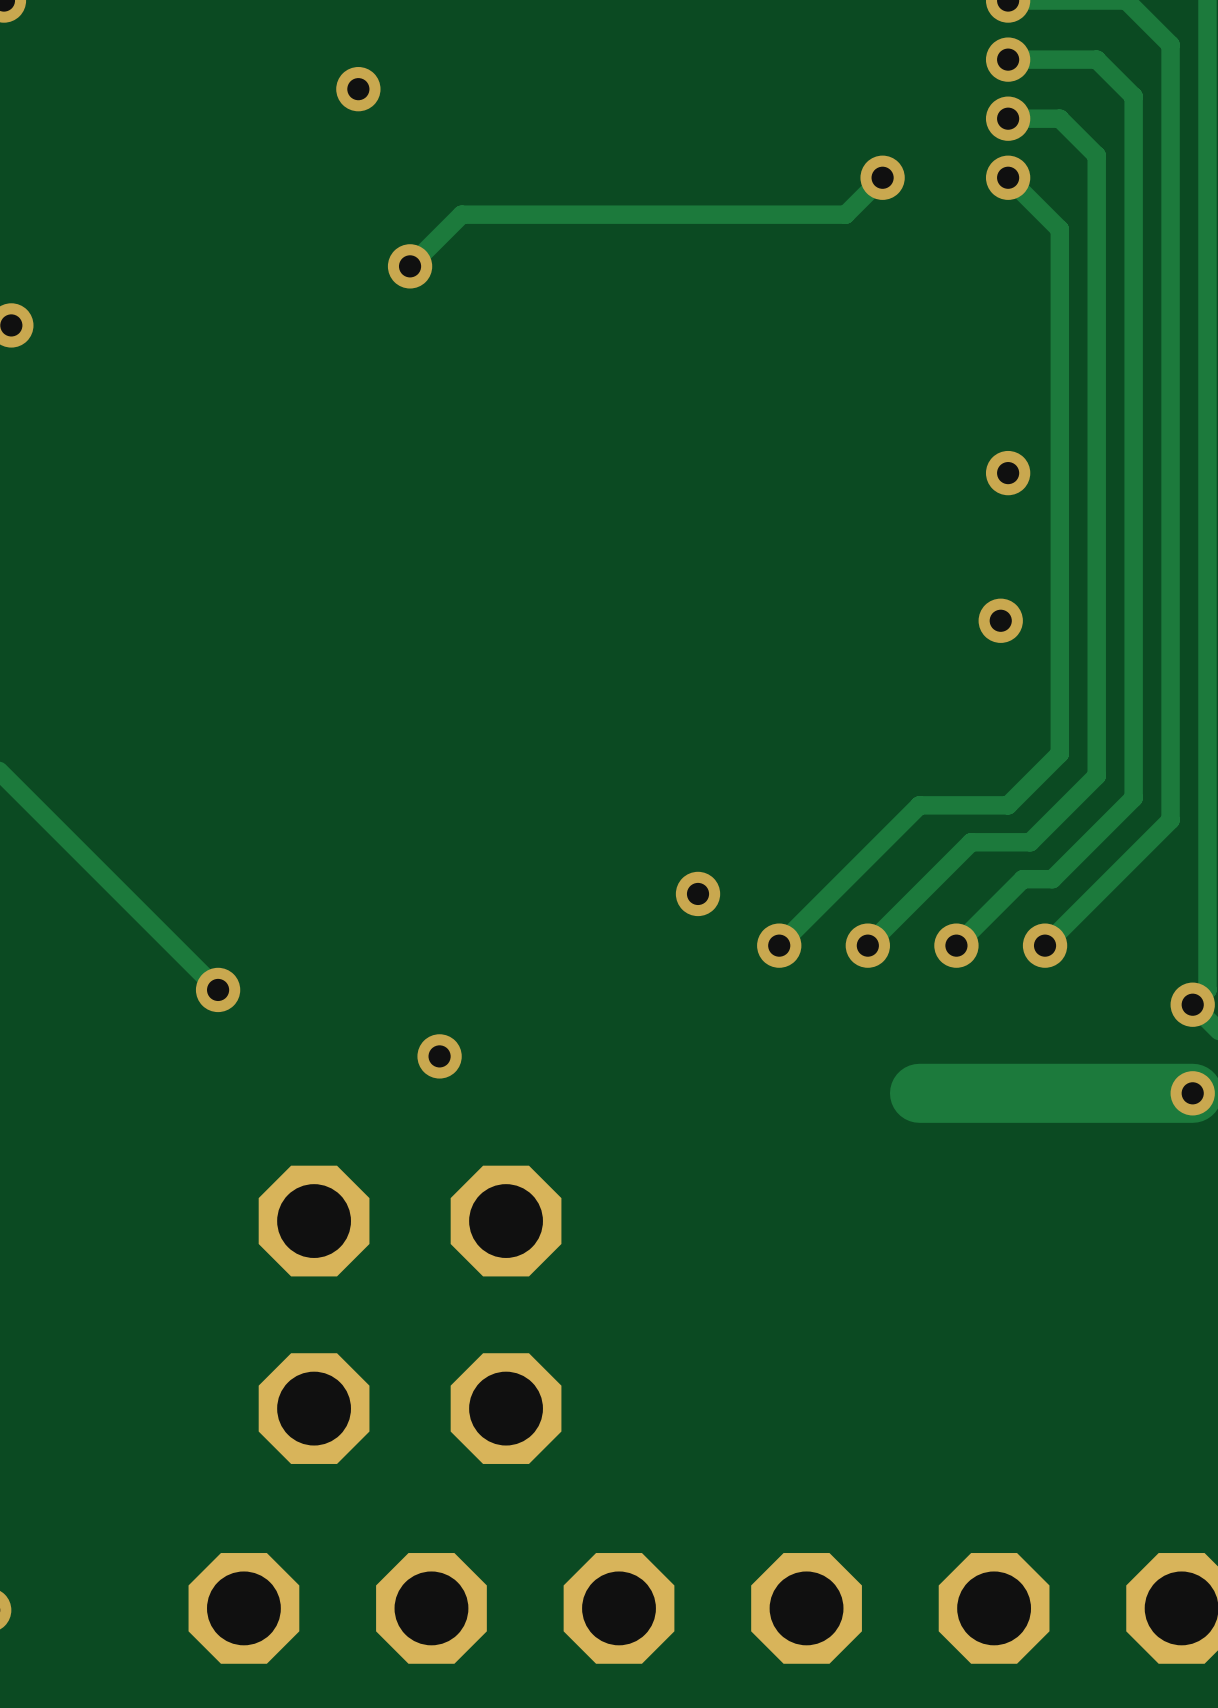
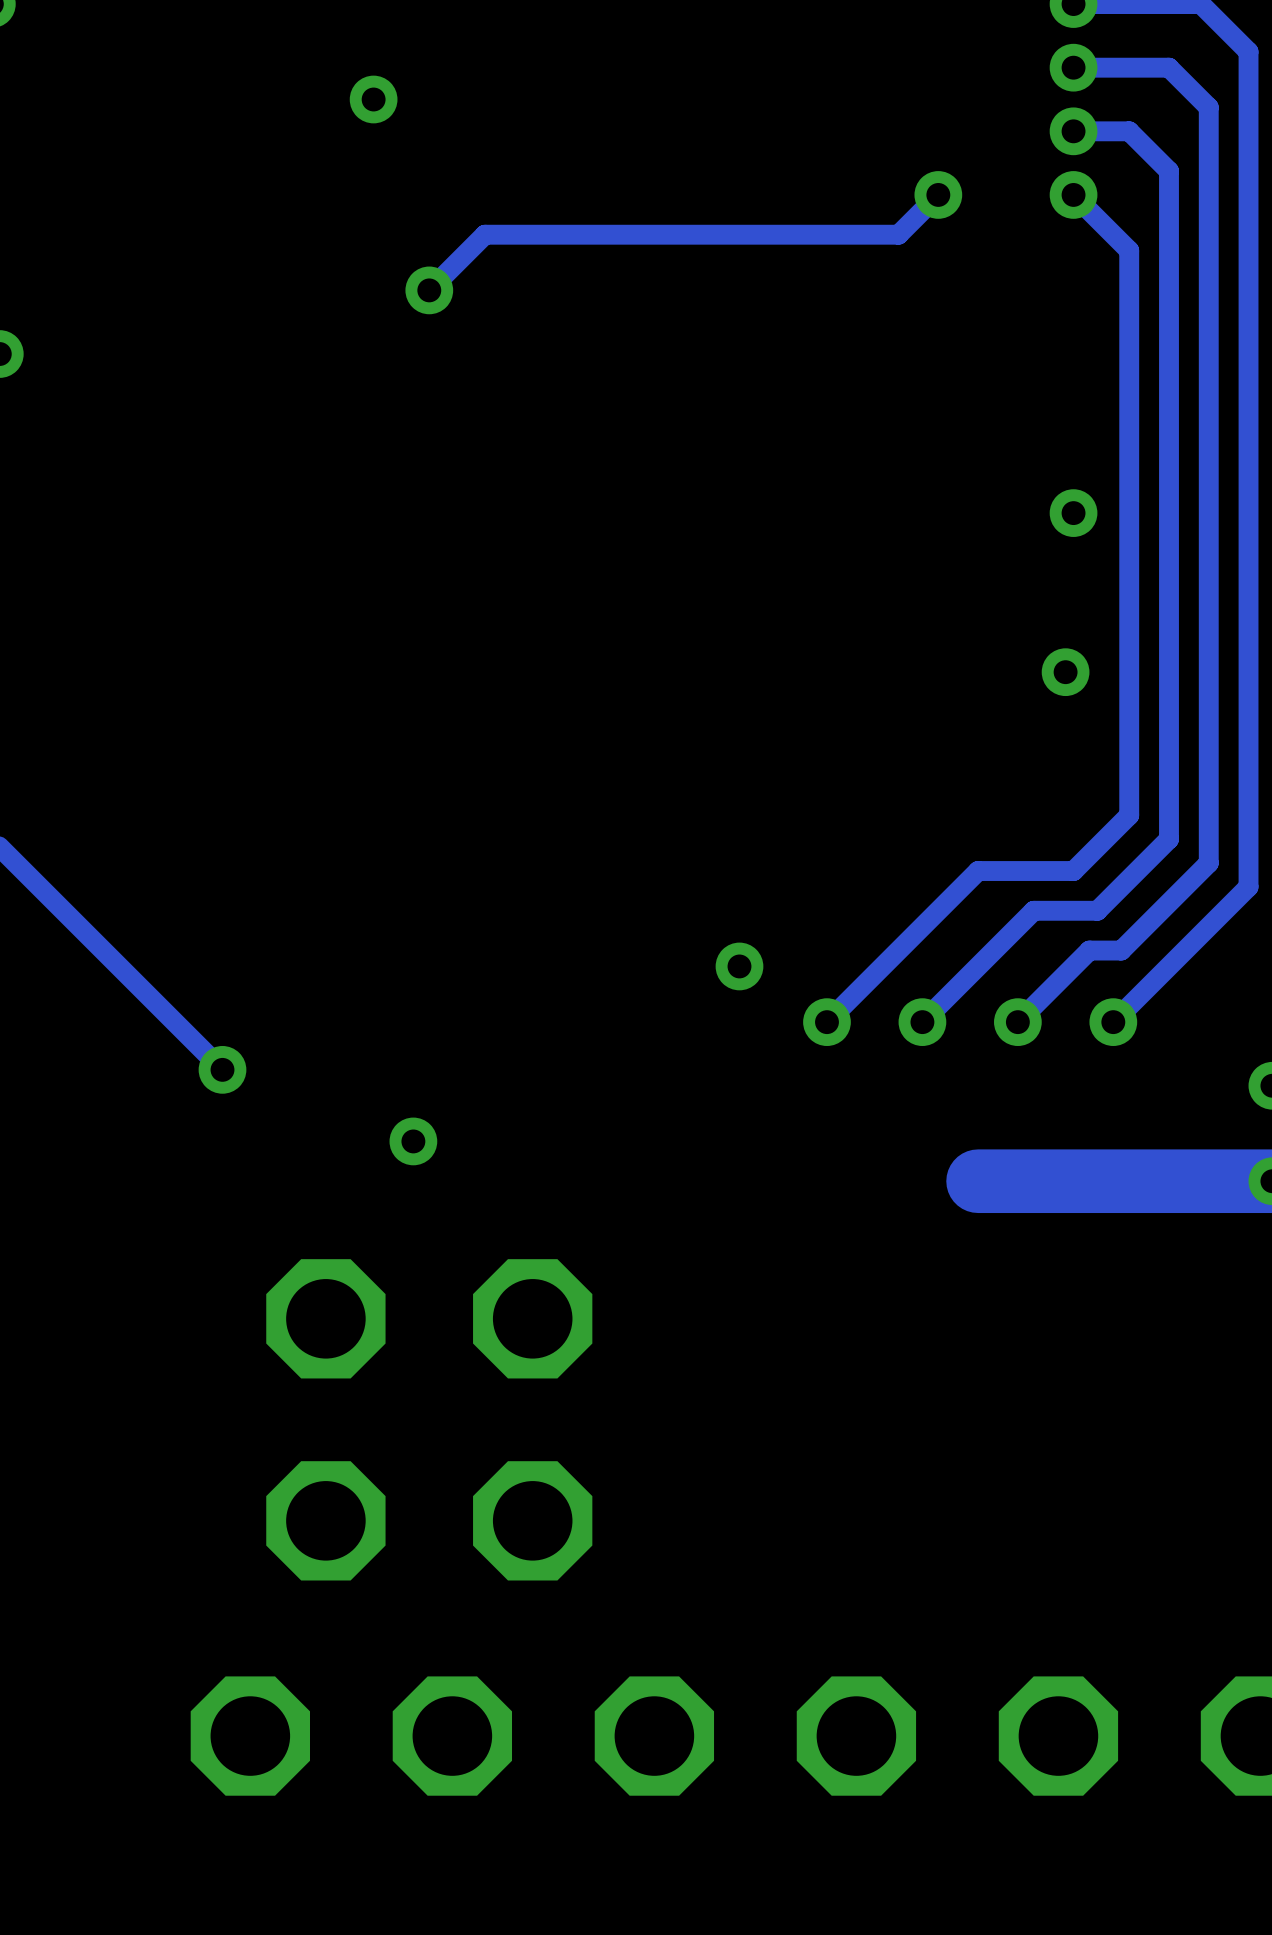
via position: (439, 1056) -> (413, 1141)

